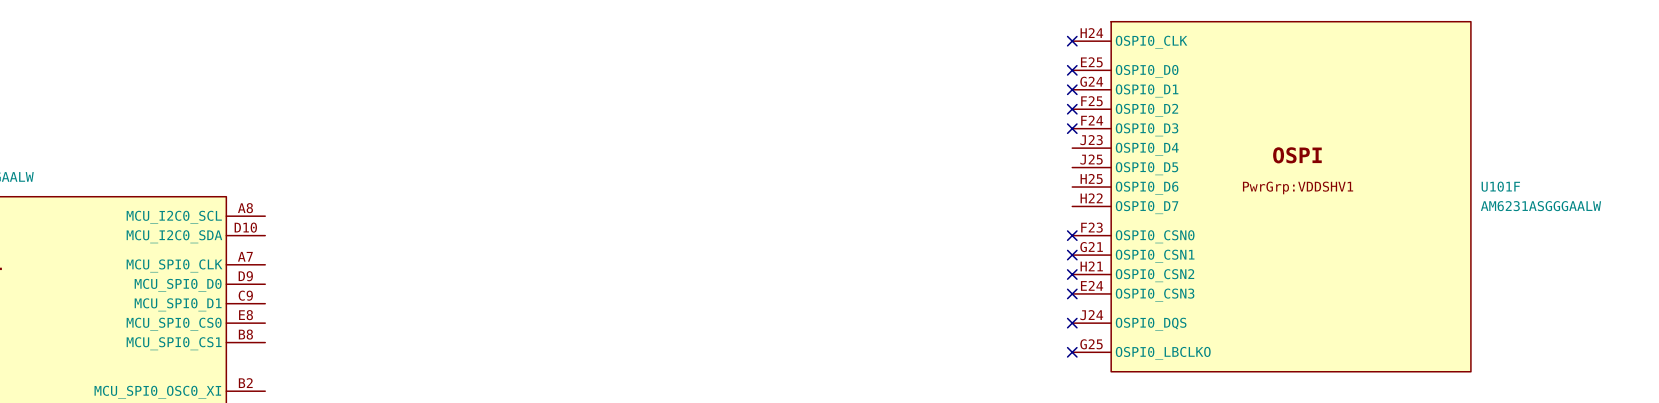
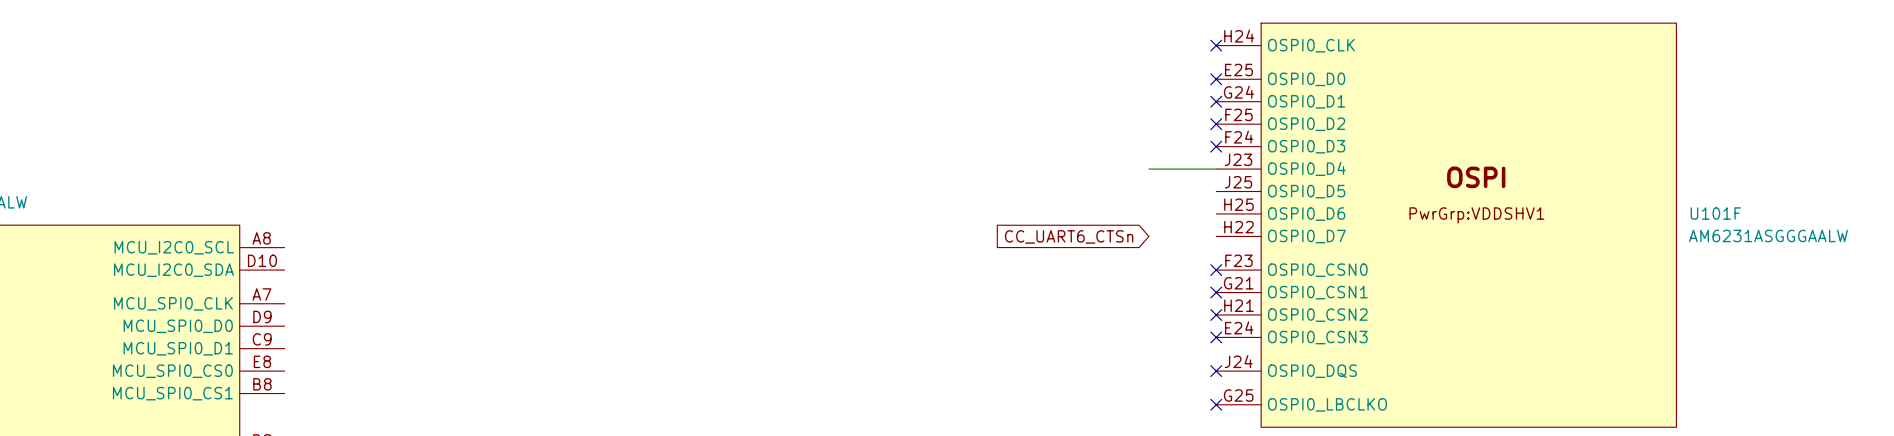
wire: none -> (1148, 169) (1216, 169)
global label: none -> CC_UART6_CTSn (1069, 236)

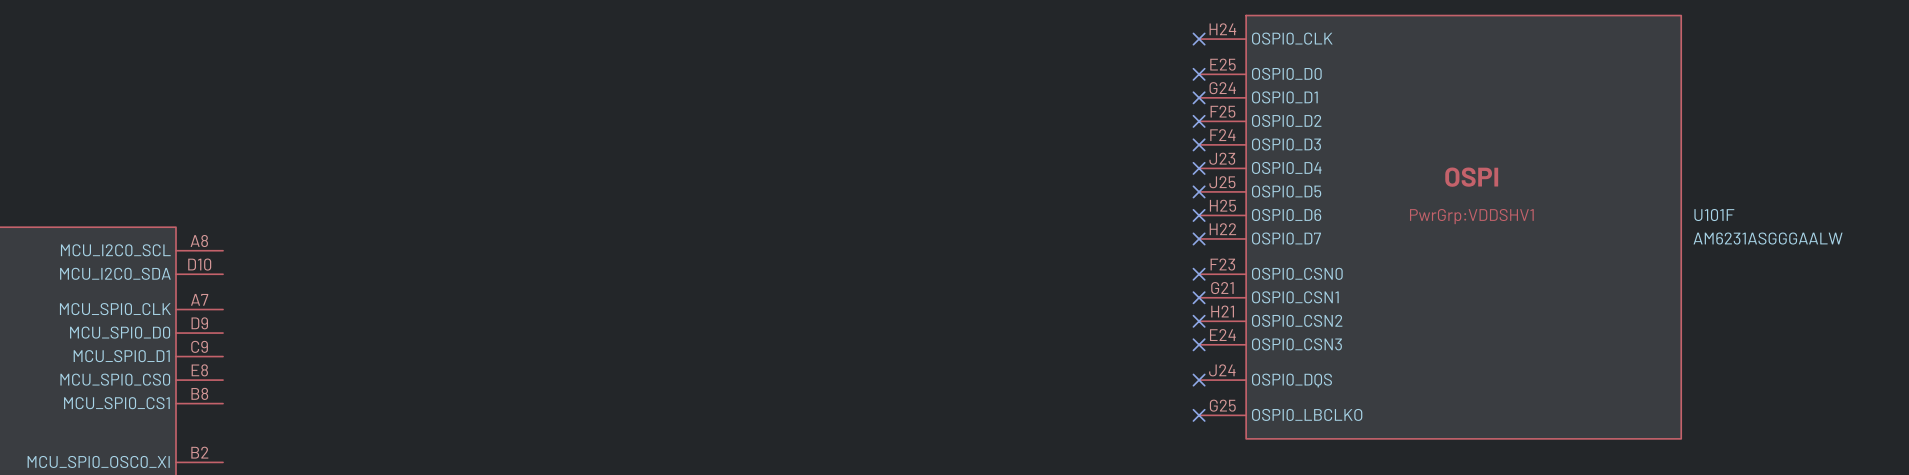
wire: (1148, 169) (1216, 169) -> none
no-connect mark: none -> (1199, 168)
no-connect mark: none -> (1199, 191)
no-connect mark: none -> (1199, 215)
global label: CC_UART6_CTSn (1069, 236) -> none
no-connect mark: none -> (1199, 238)

